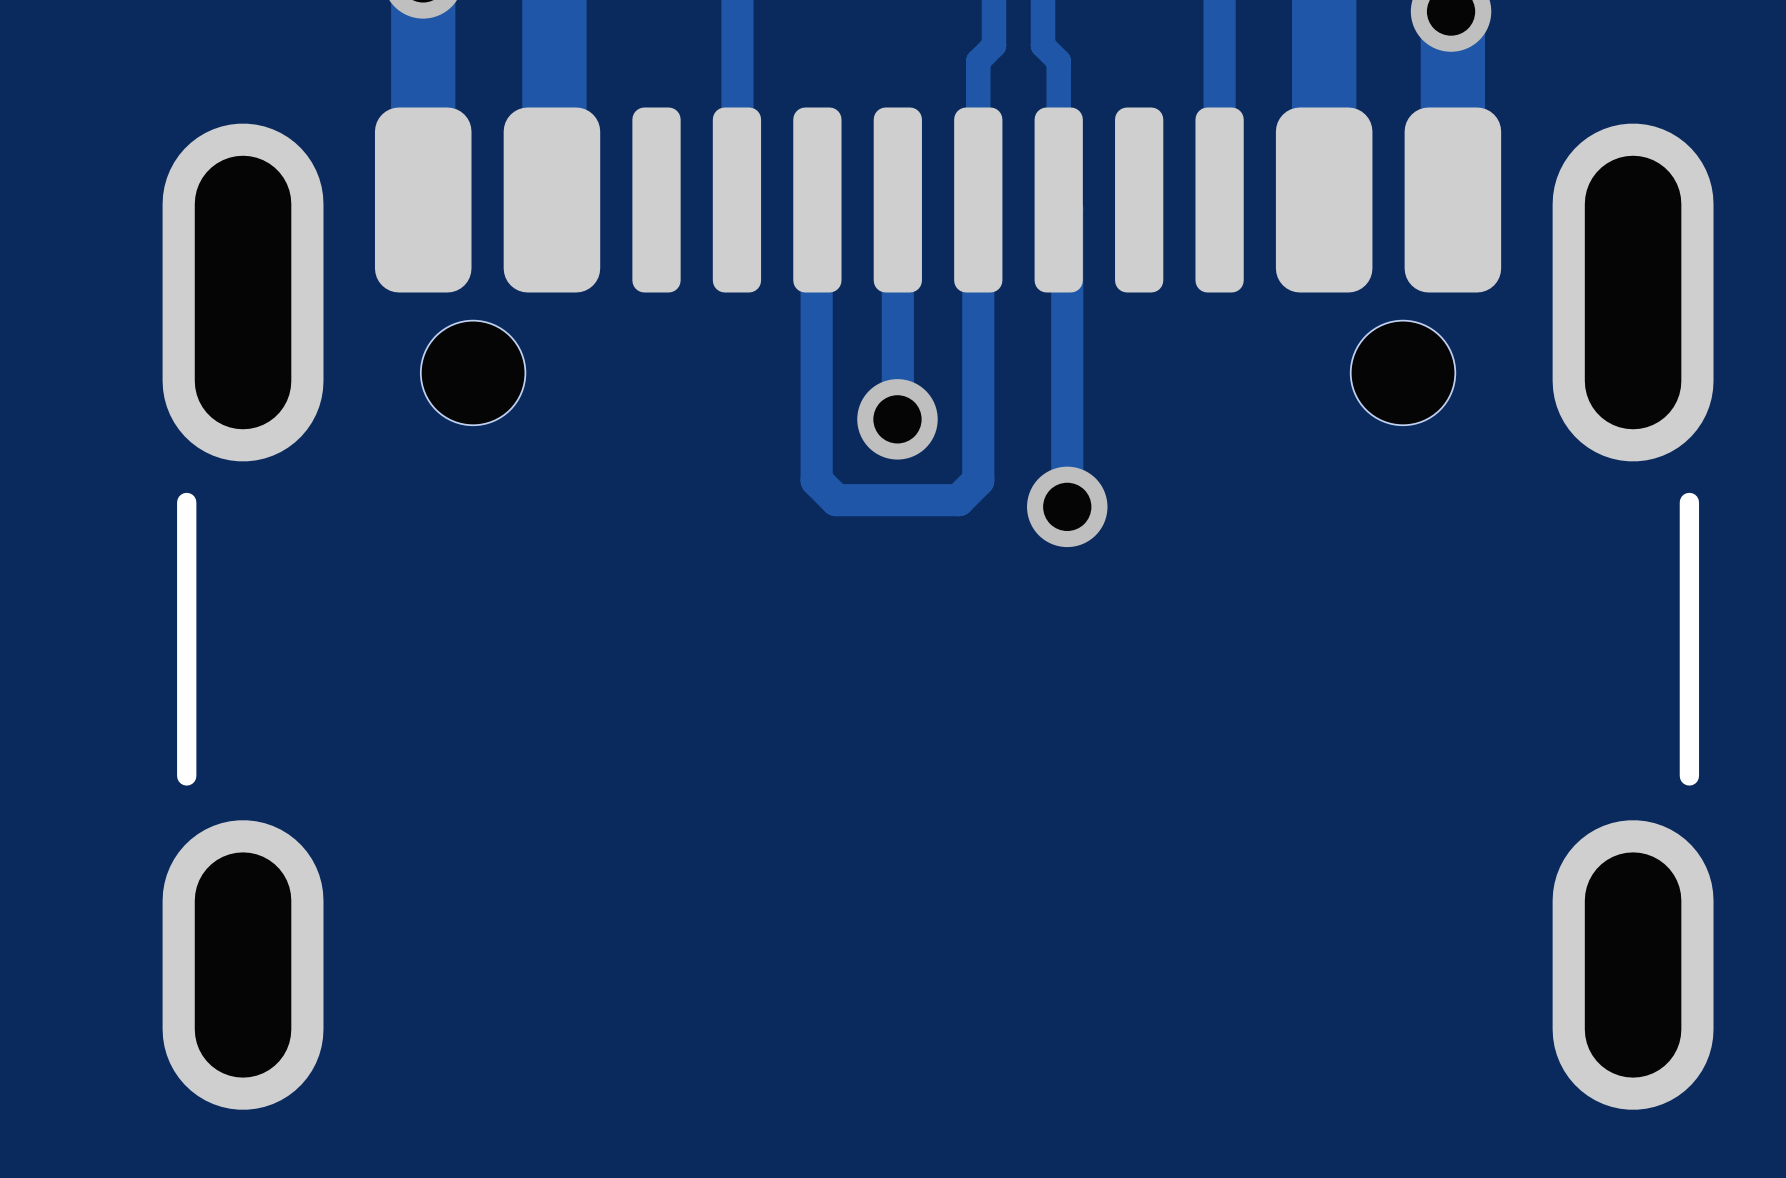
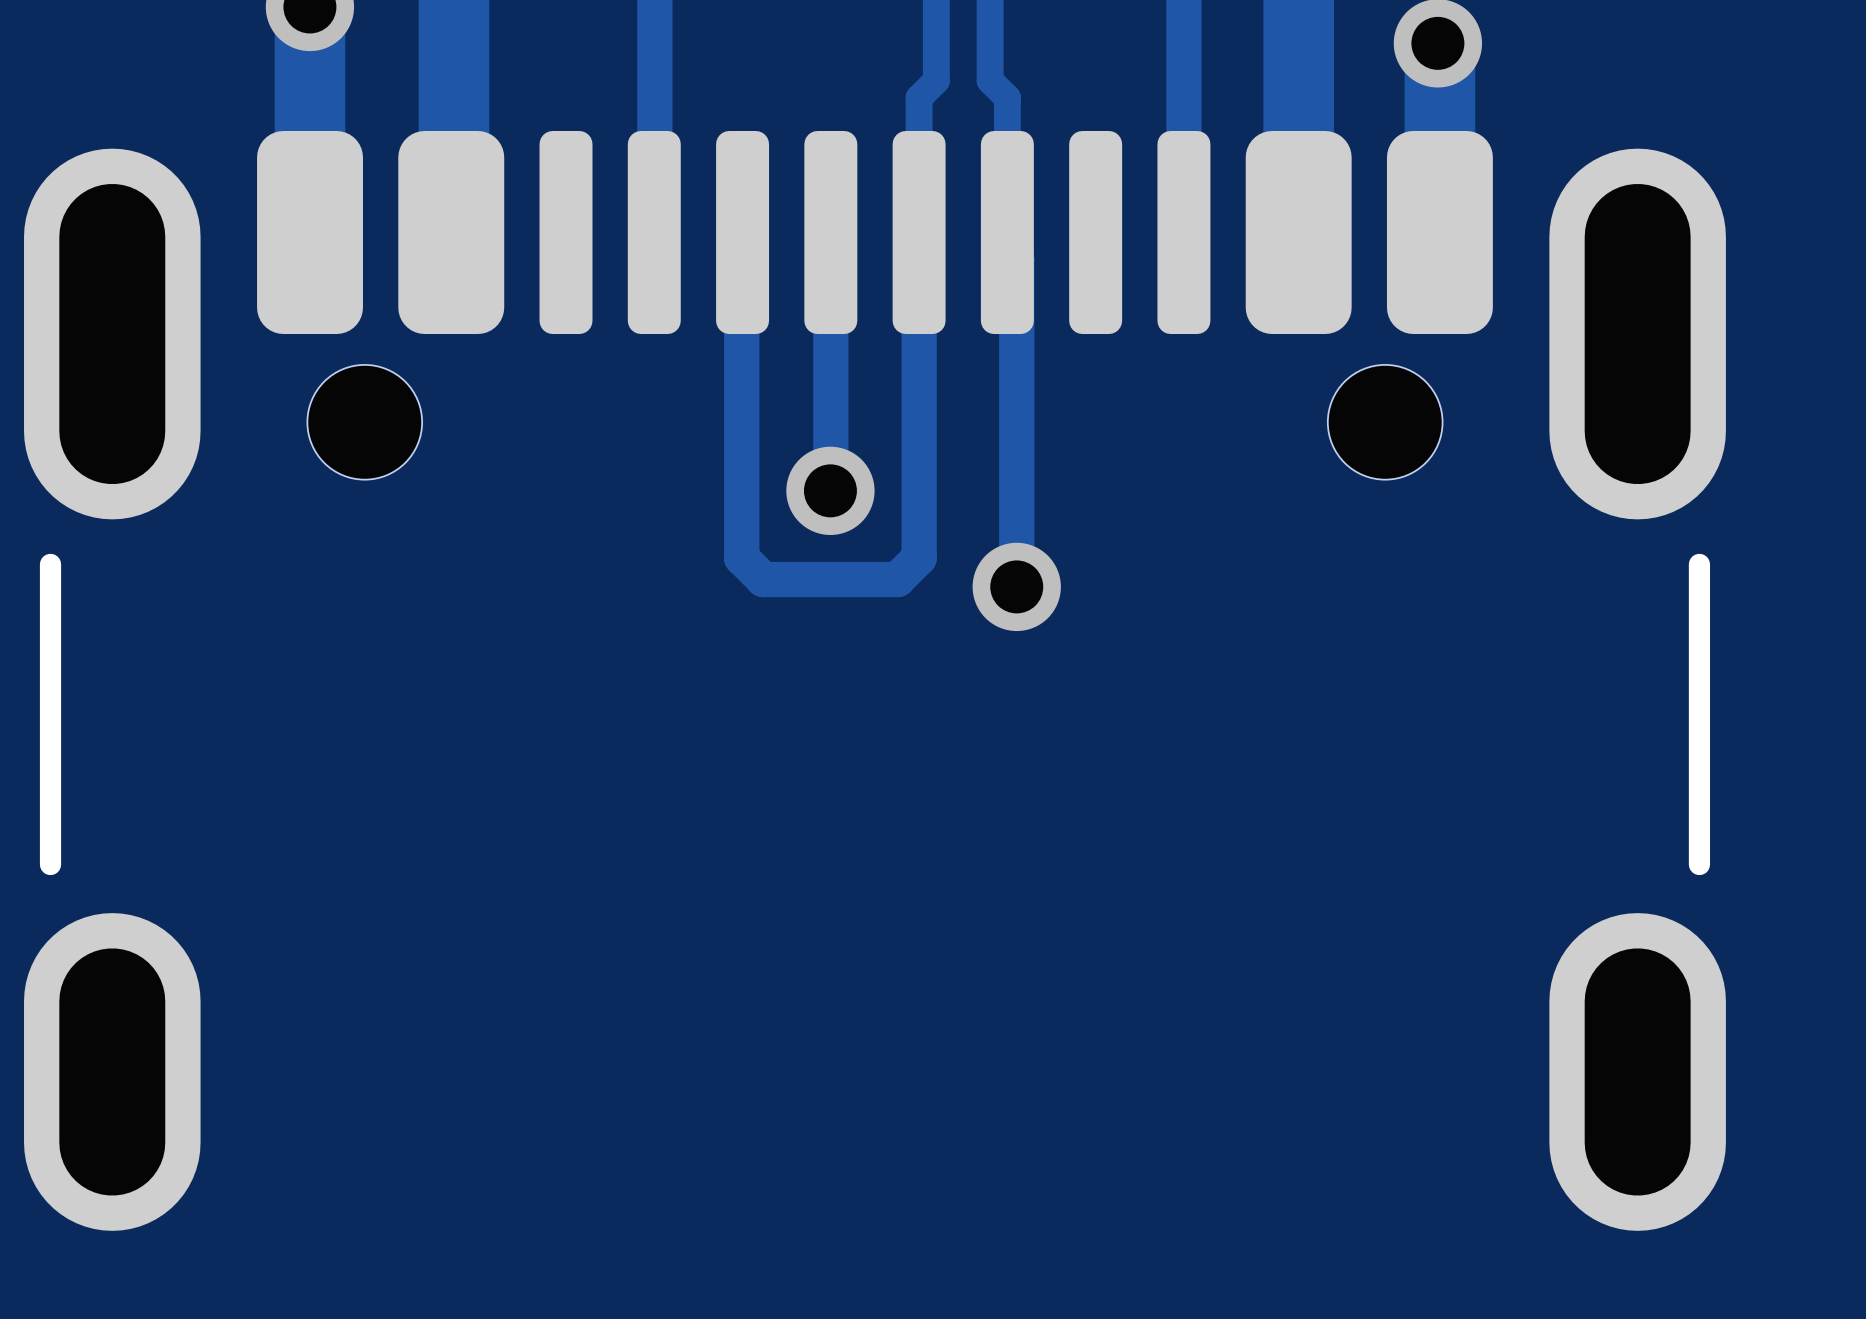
part position: (938, 608) -> (874, 680)

